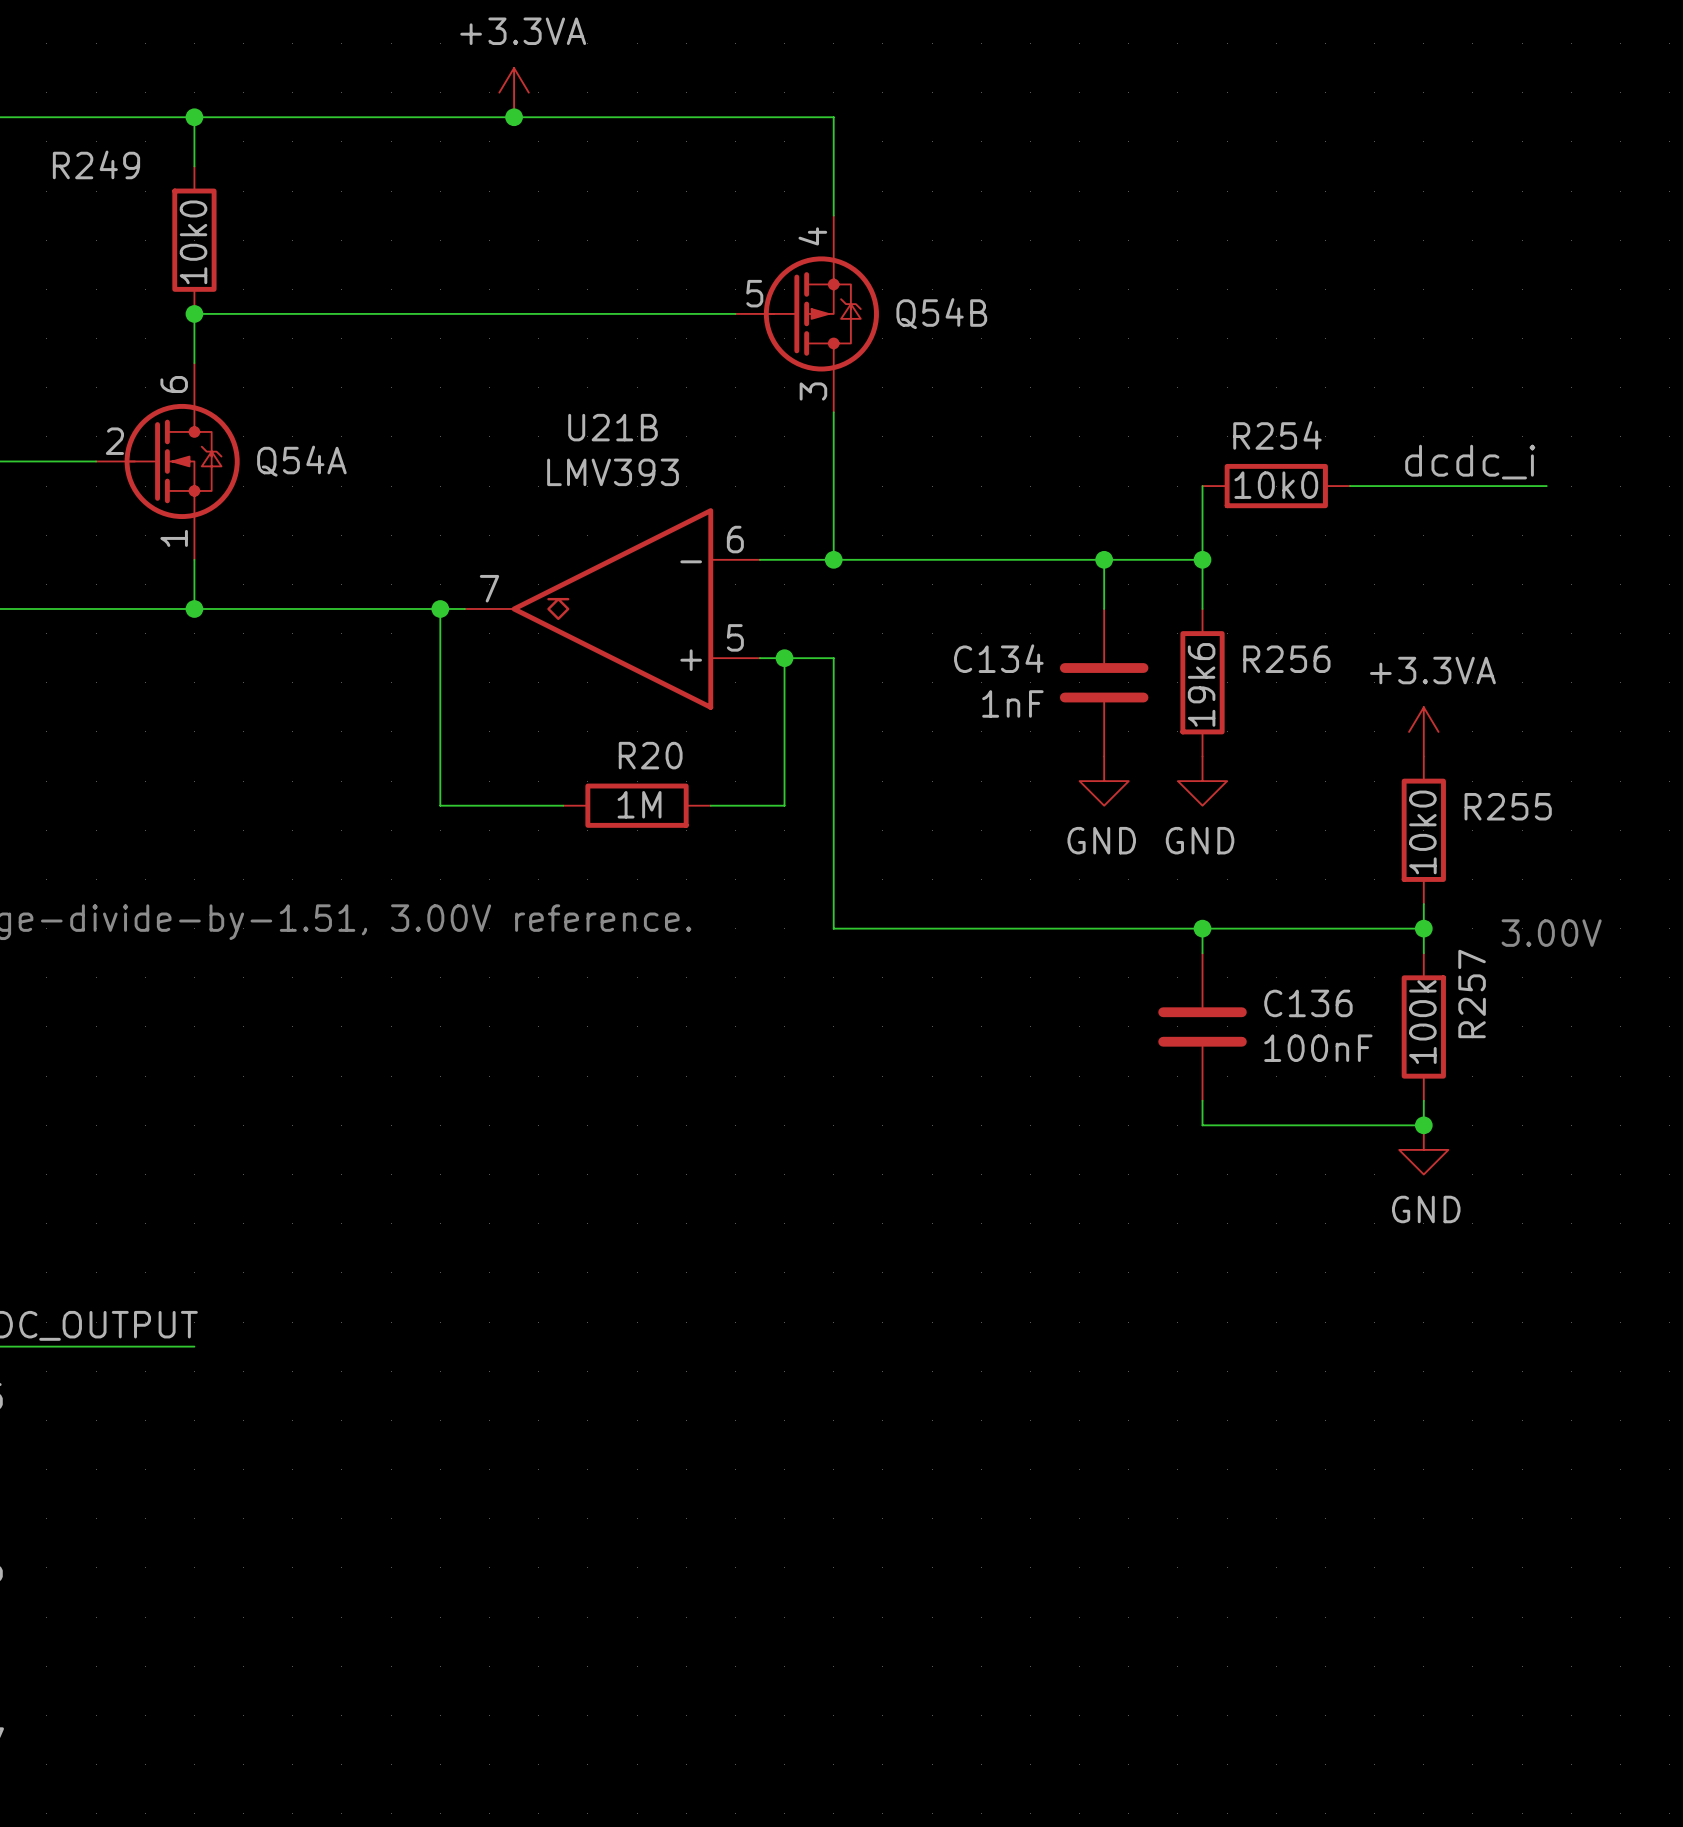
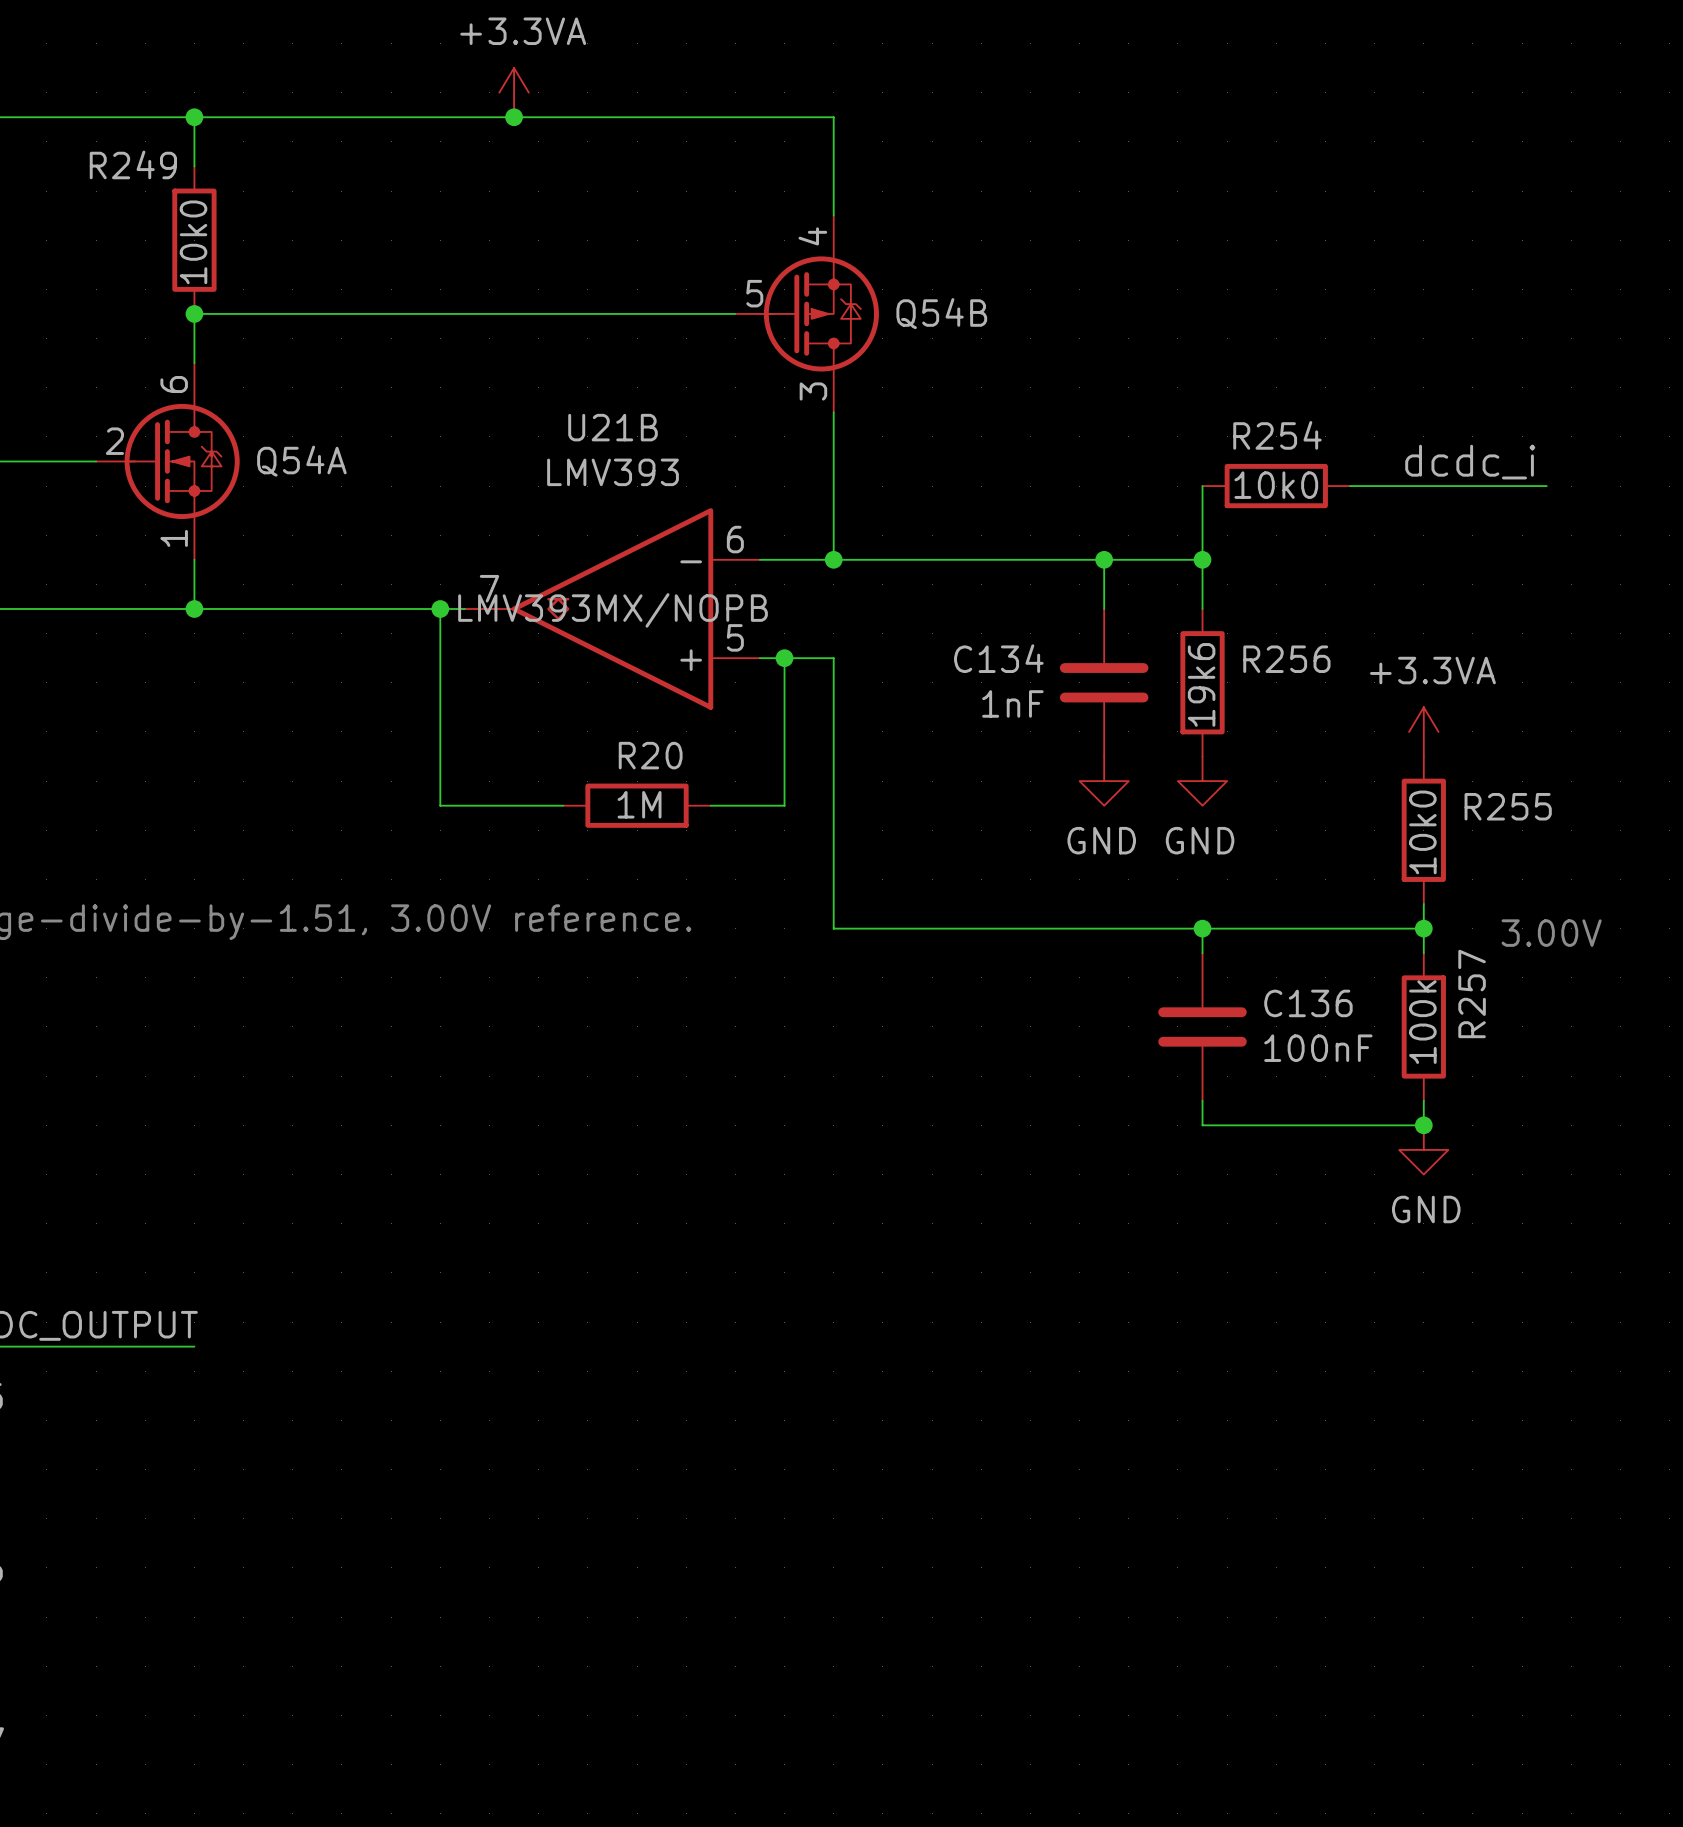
R249 name position: R249 (96, 164) -> R249 (133, 164)
U21B text: none -> LMV393MX/NOPB (613, 610)

